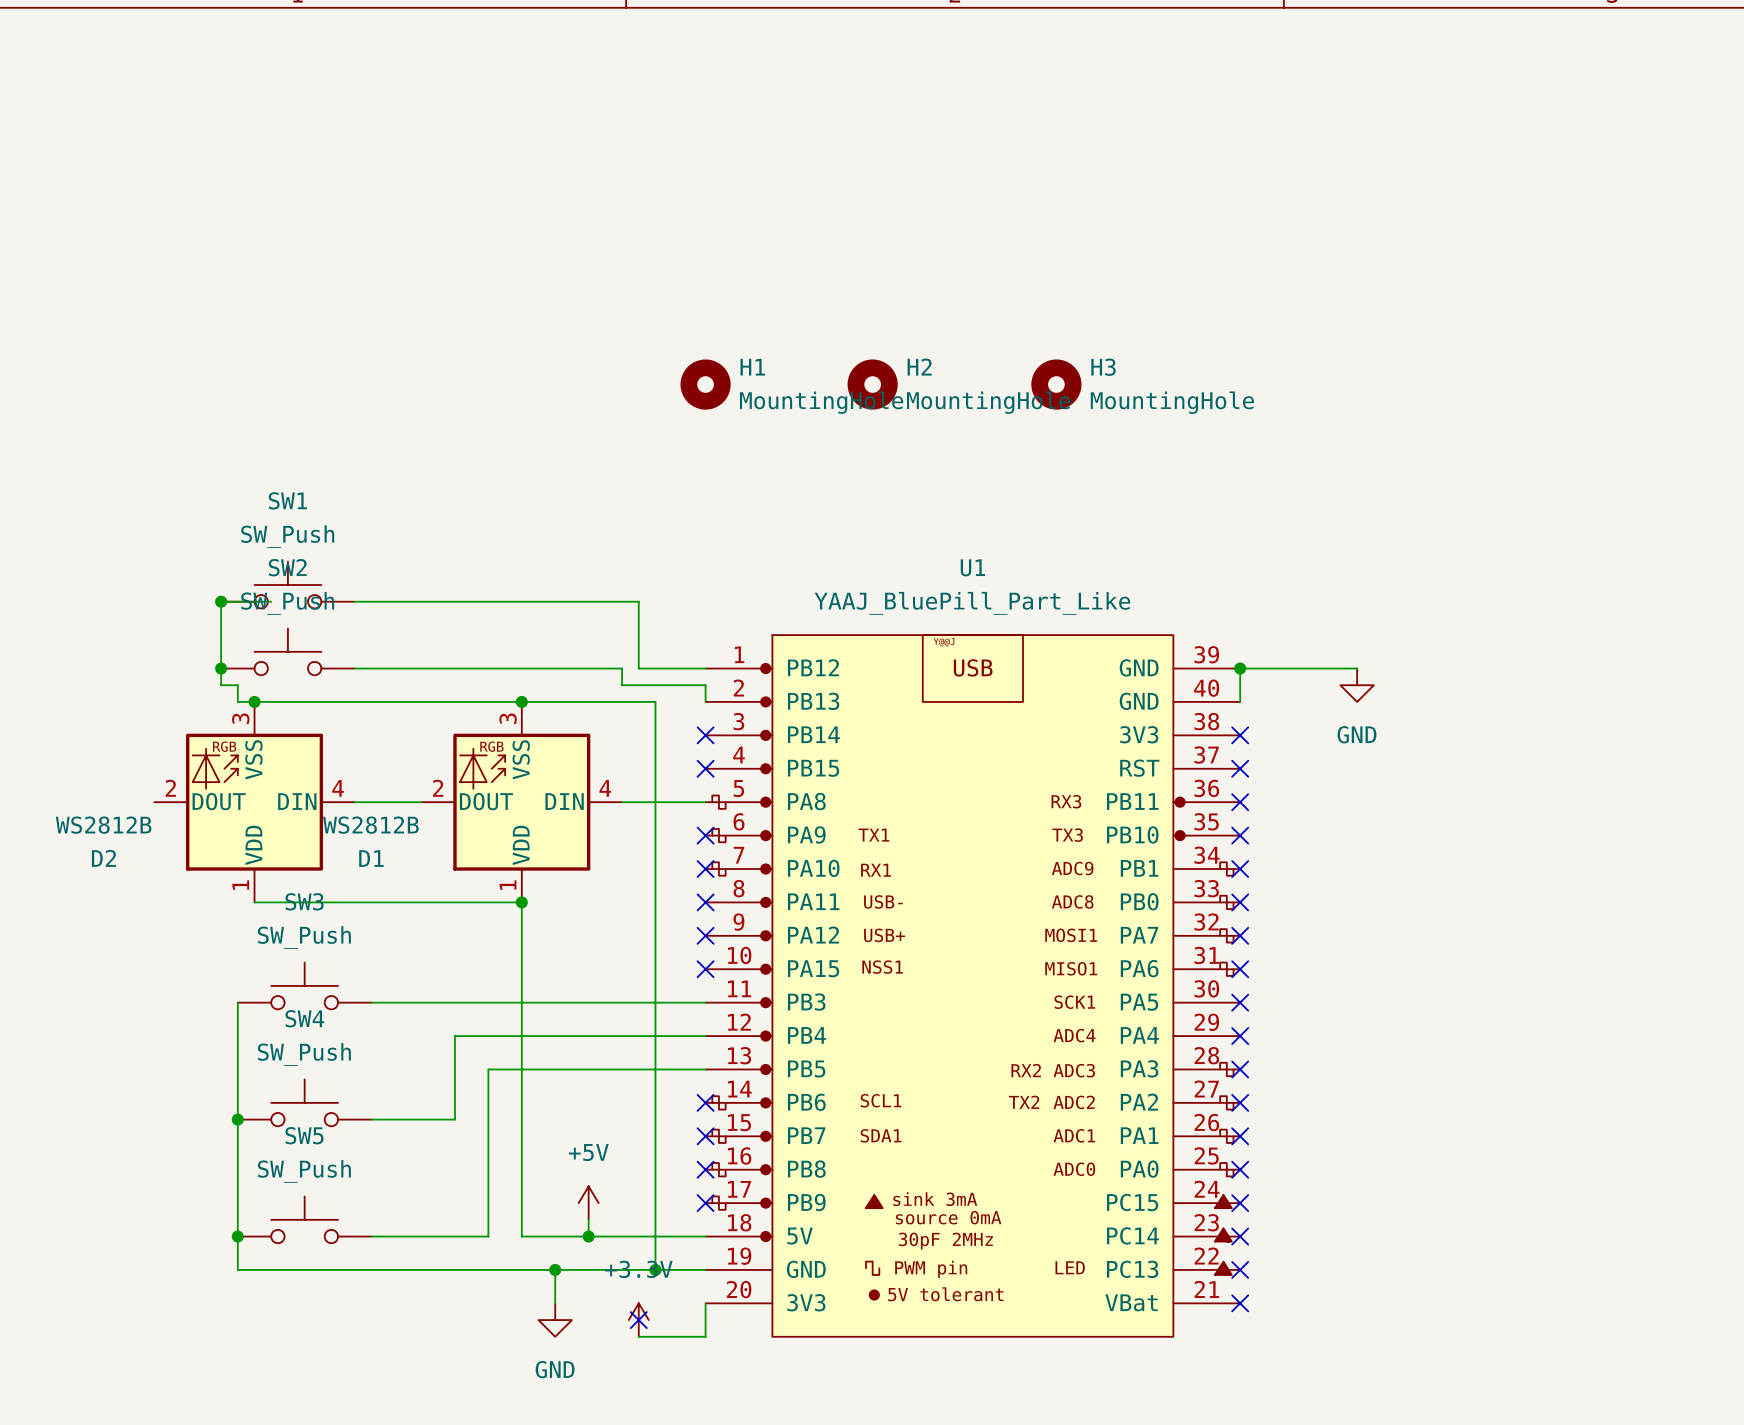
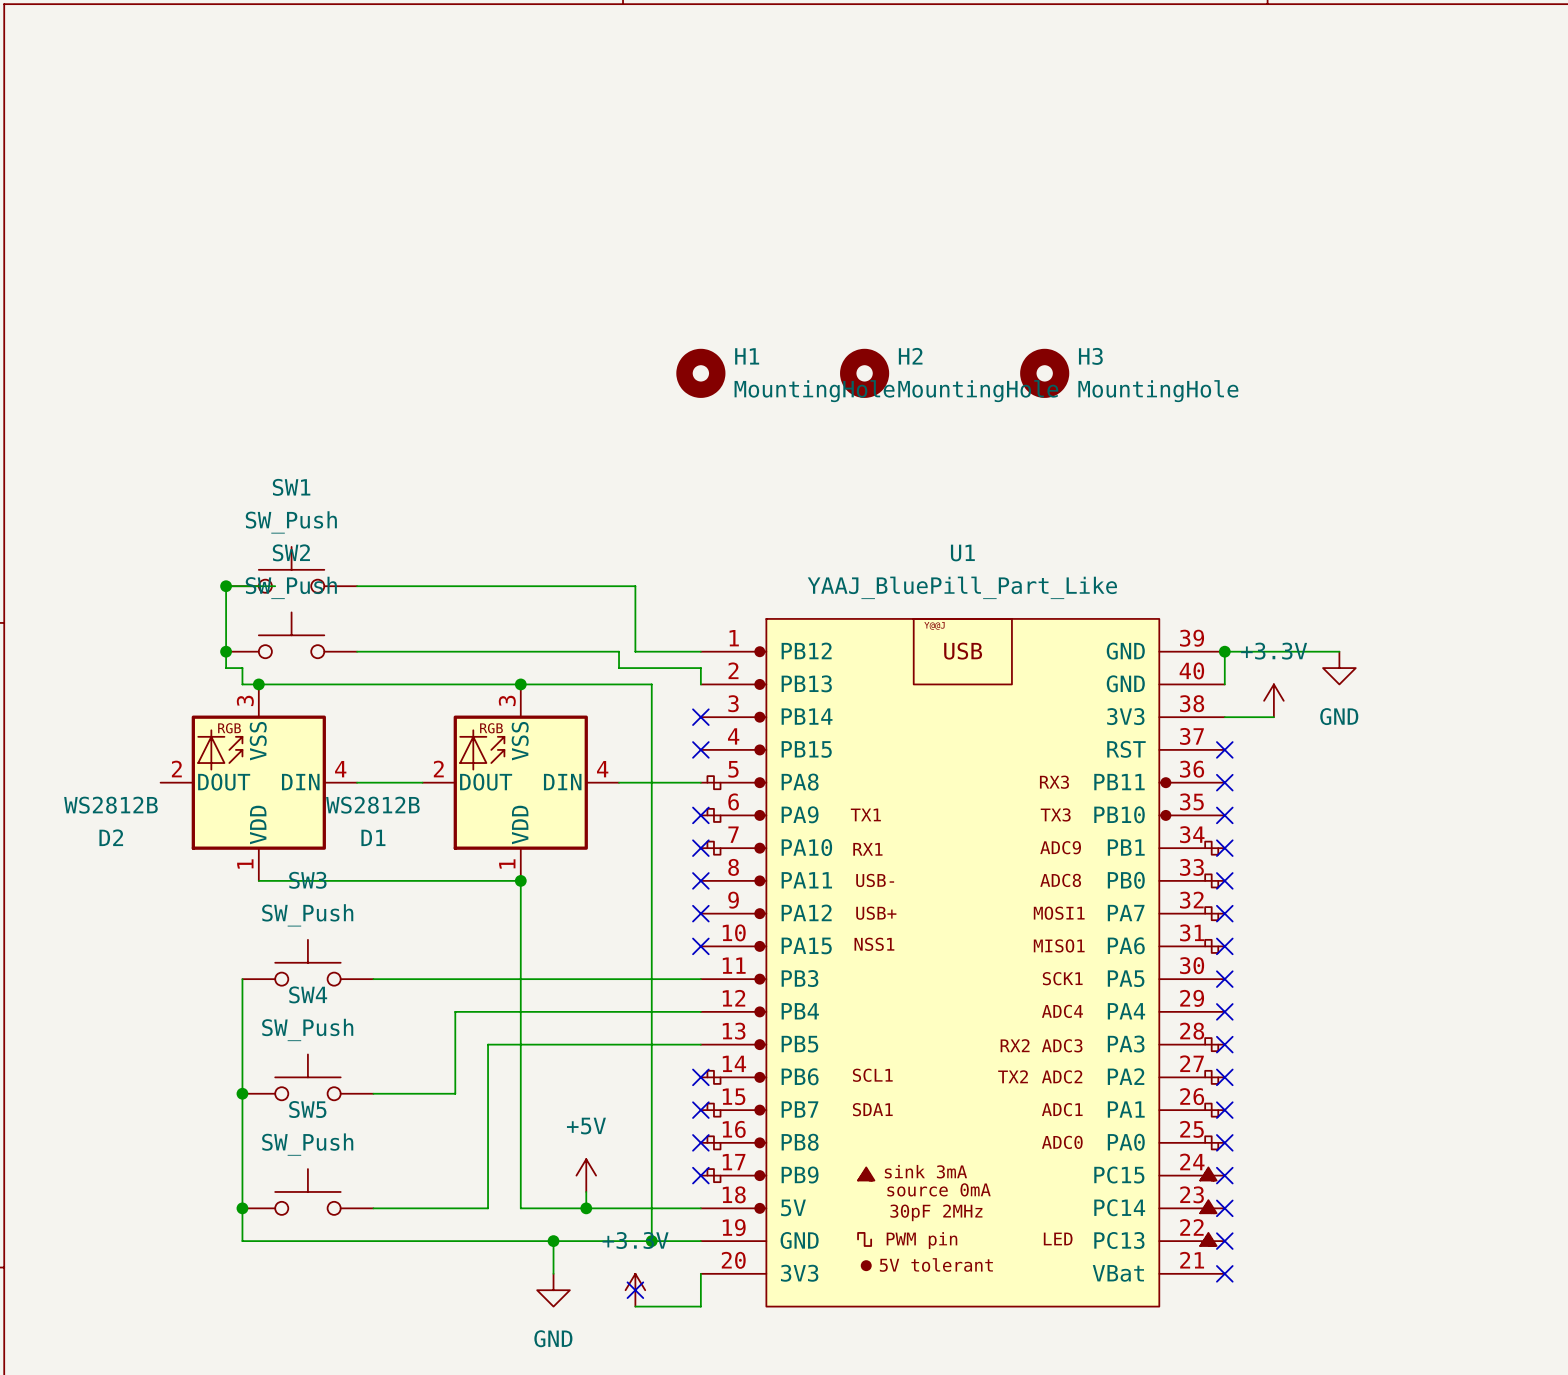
power symbol: none -> +3.3V (1273, 700)
wire: none -> (1224, 717) (1273, 717)
no-connect mark: (1240, 735) -> none

